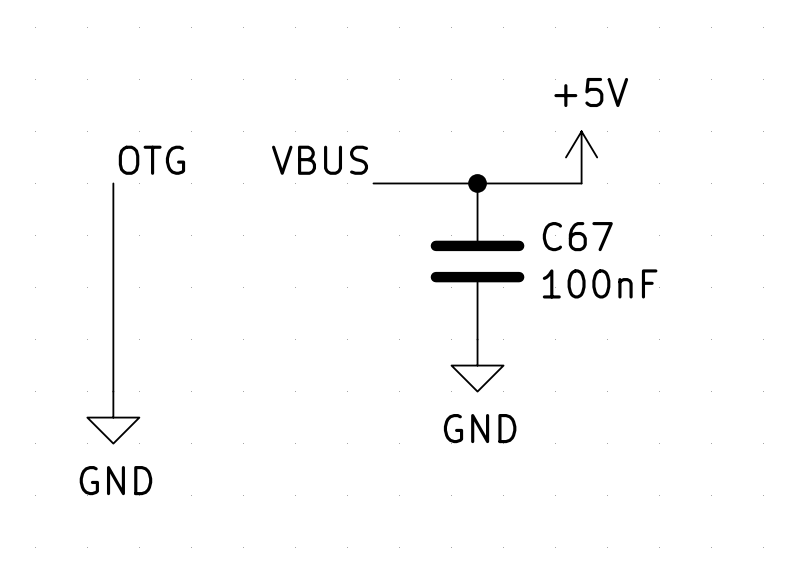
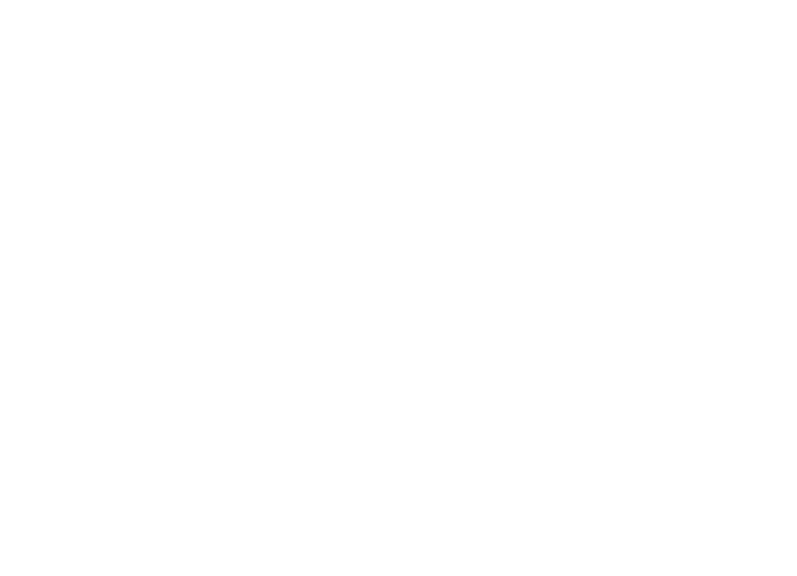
power symbol: +5V (581, 157) -> none
label: OTG (151, 160) -> none
label: VBUS (320, 160) -> none
wire: (113, 183) (113, 391) -> none
wire: (373, 183) (581, 183) -> none
junction: (477, 183) -> none
C67: 100nF (477, 261) -> none
power symbol: GND (477, 365) -> none
power symbol: GND (113, 417) -> none

